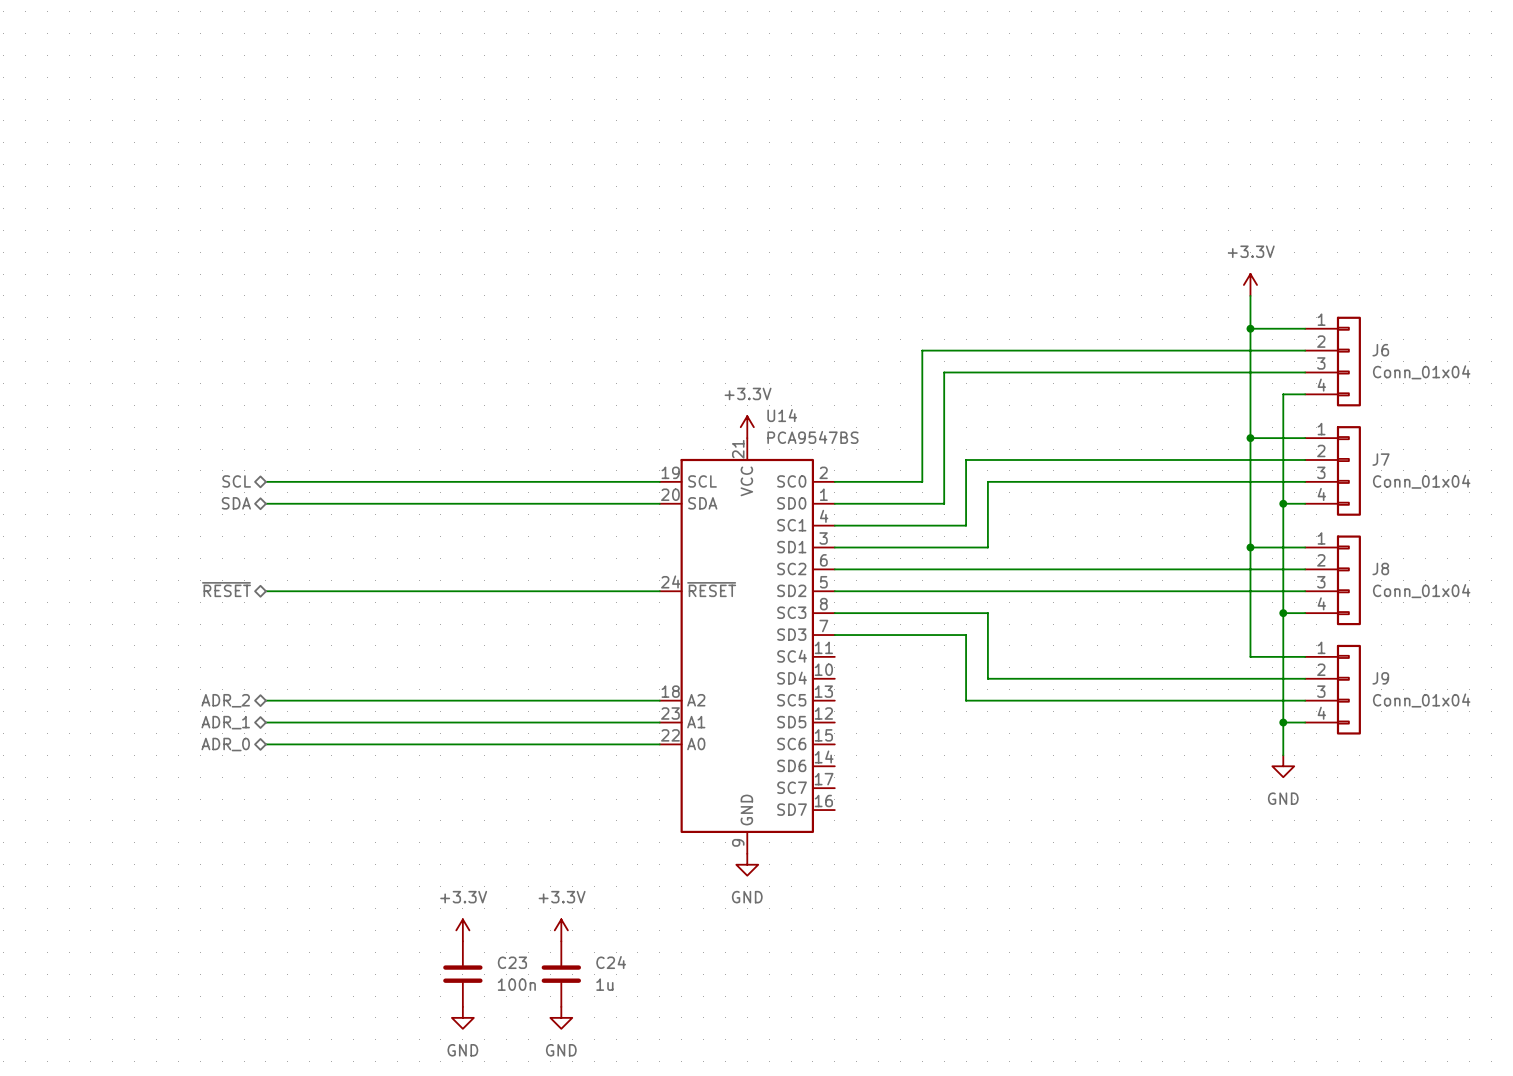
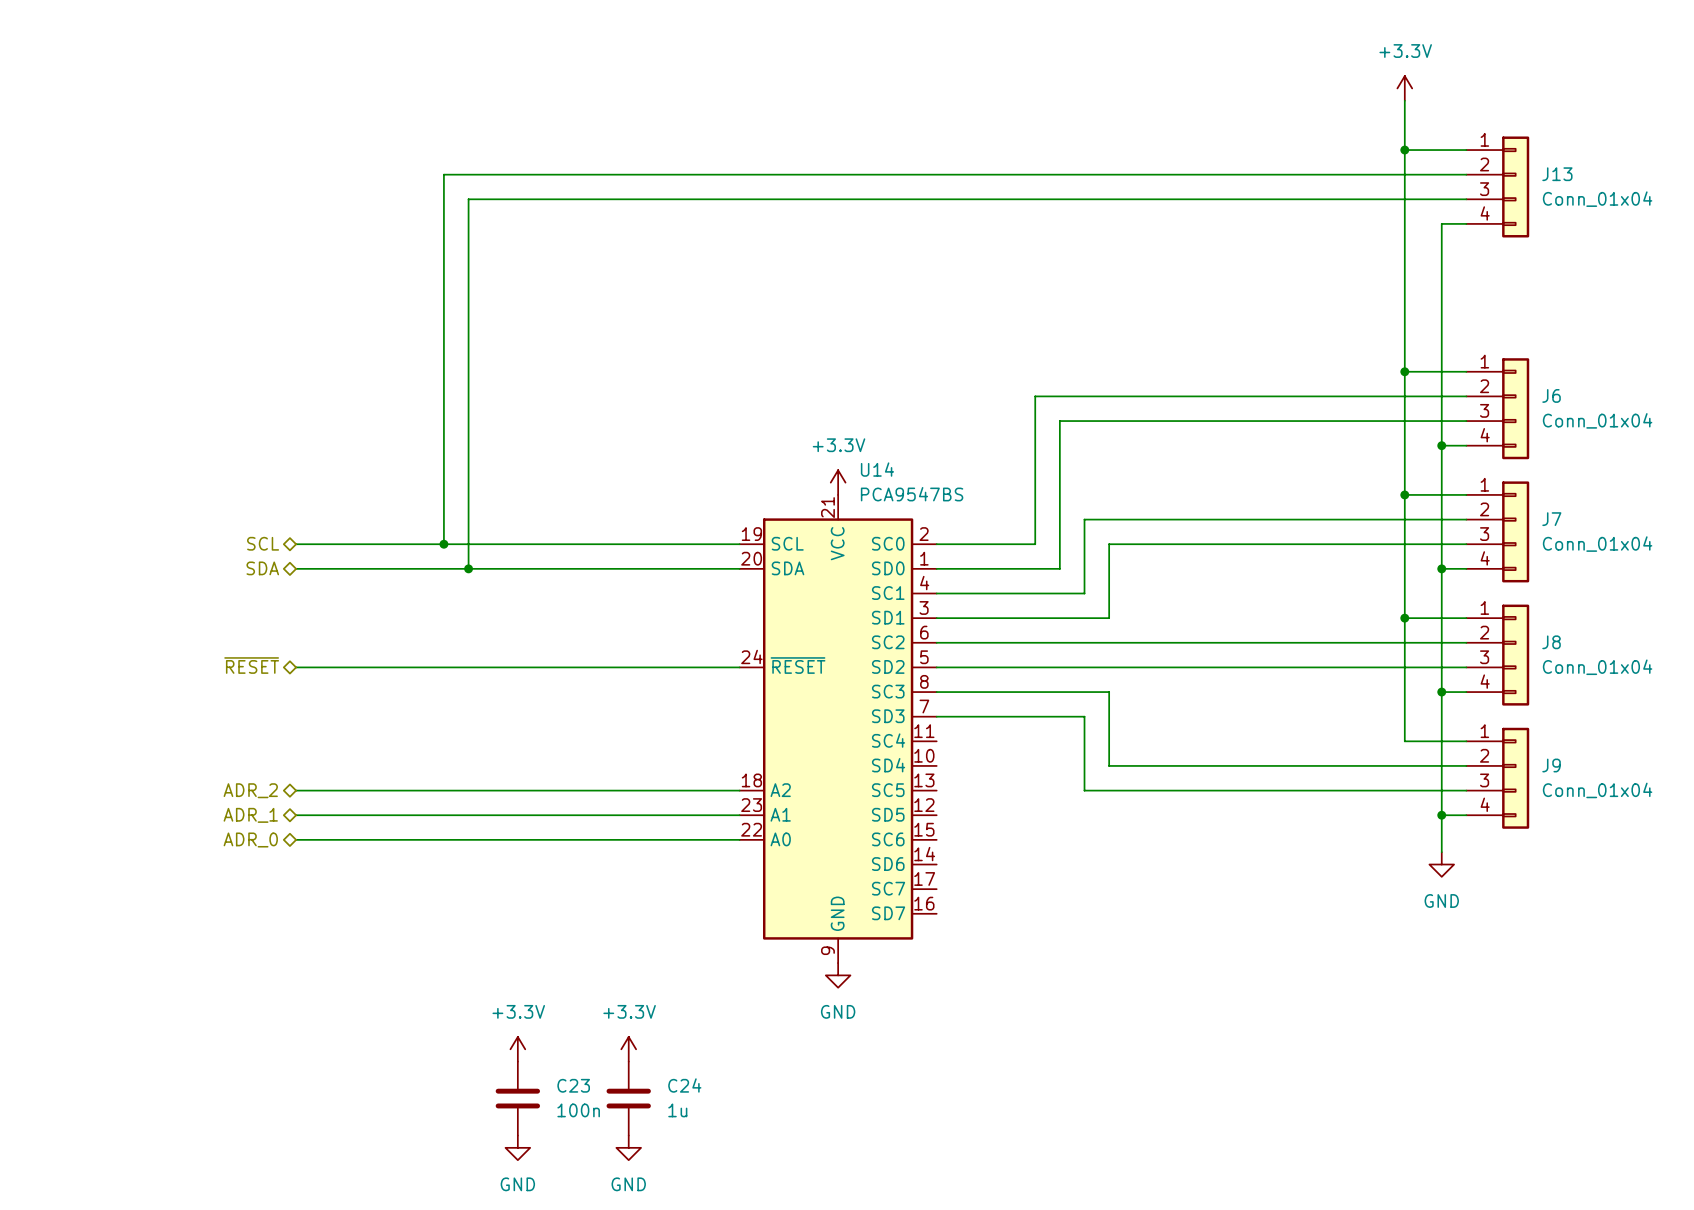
wire: none -> (1404, 100) (1404, 334)
wire: none -> (1404, 150) (1466, 150)
junction: none -> (1404, 150)
wire: none -> (1466, 174) (443, 174) (443, 544)
J13: none -> Conn_01x04 (1497, 186)
wire: none -> (1466, 199) (468, 199) (468, 568)
wire: none -> (1466, 223) (1441, 223) (1441, 445)
power symbol position: +3.3V (1250, 284) -> +3.3V (1404, 88)
junction: none -> (1441, 445)
junction: none -> (443, 544)
junction: none -> (468, 568)

